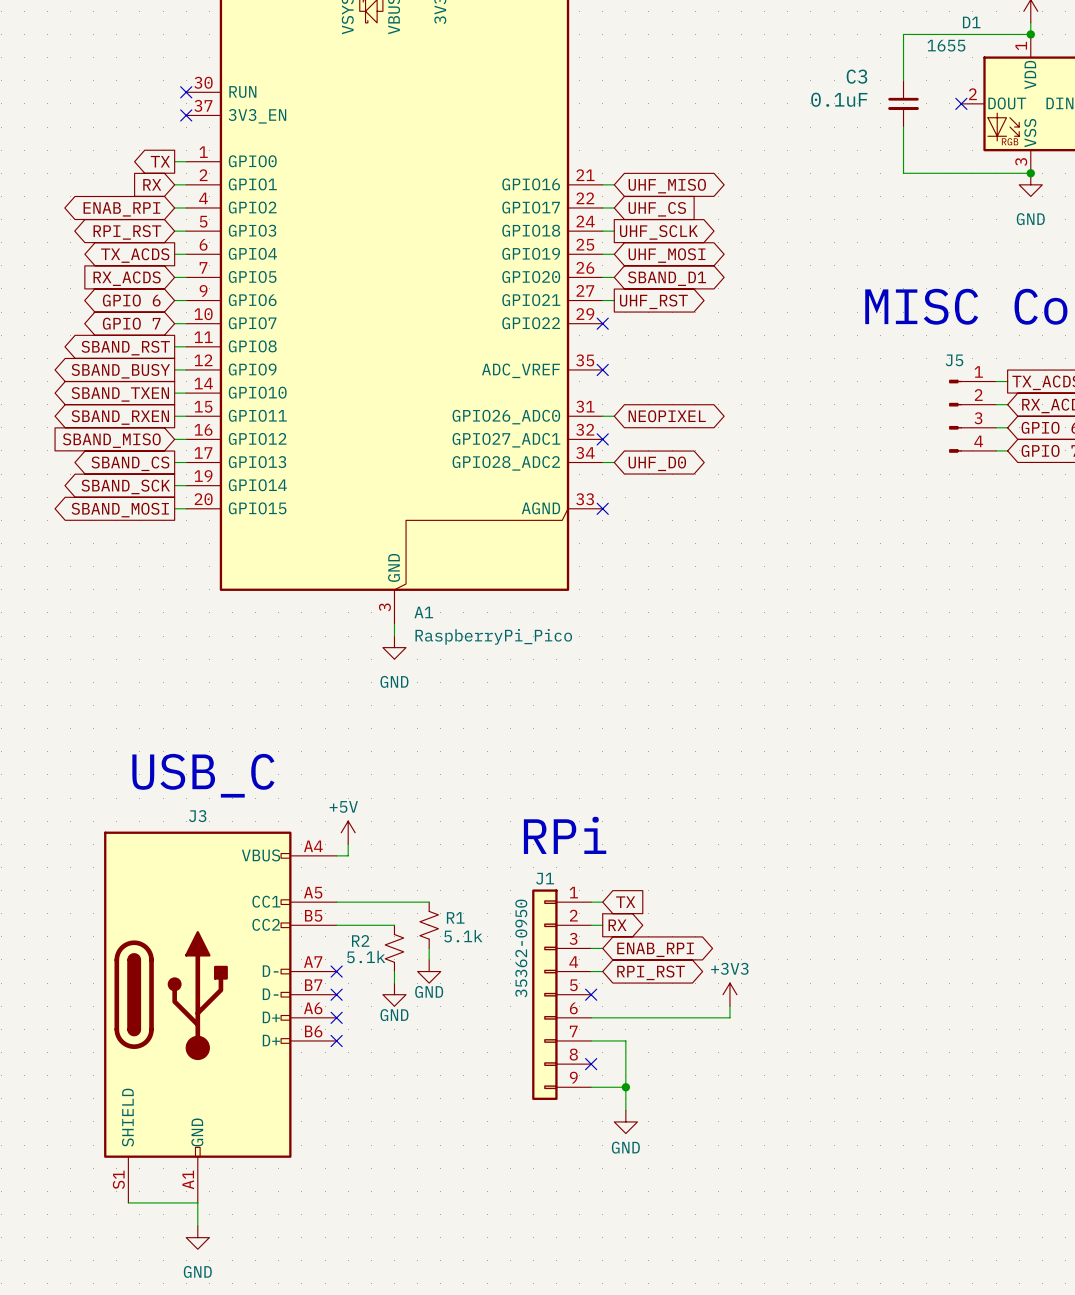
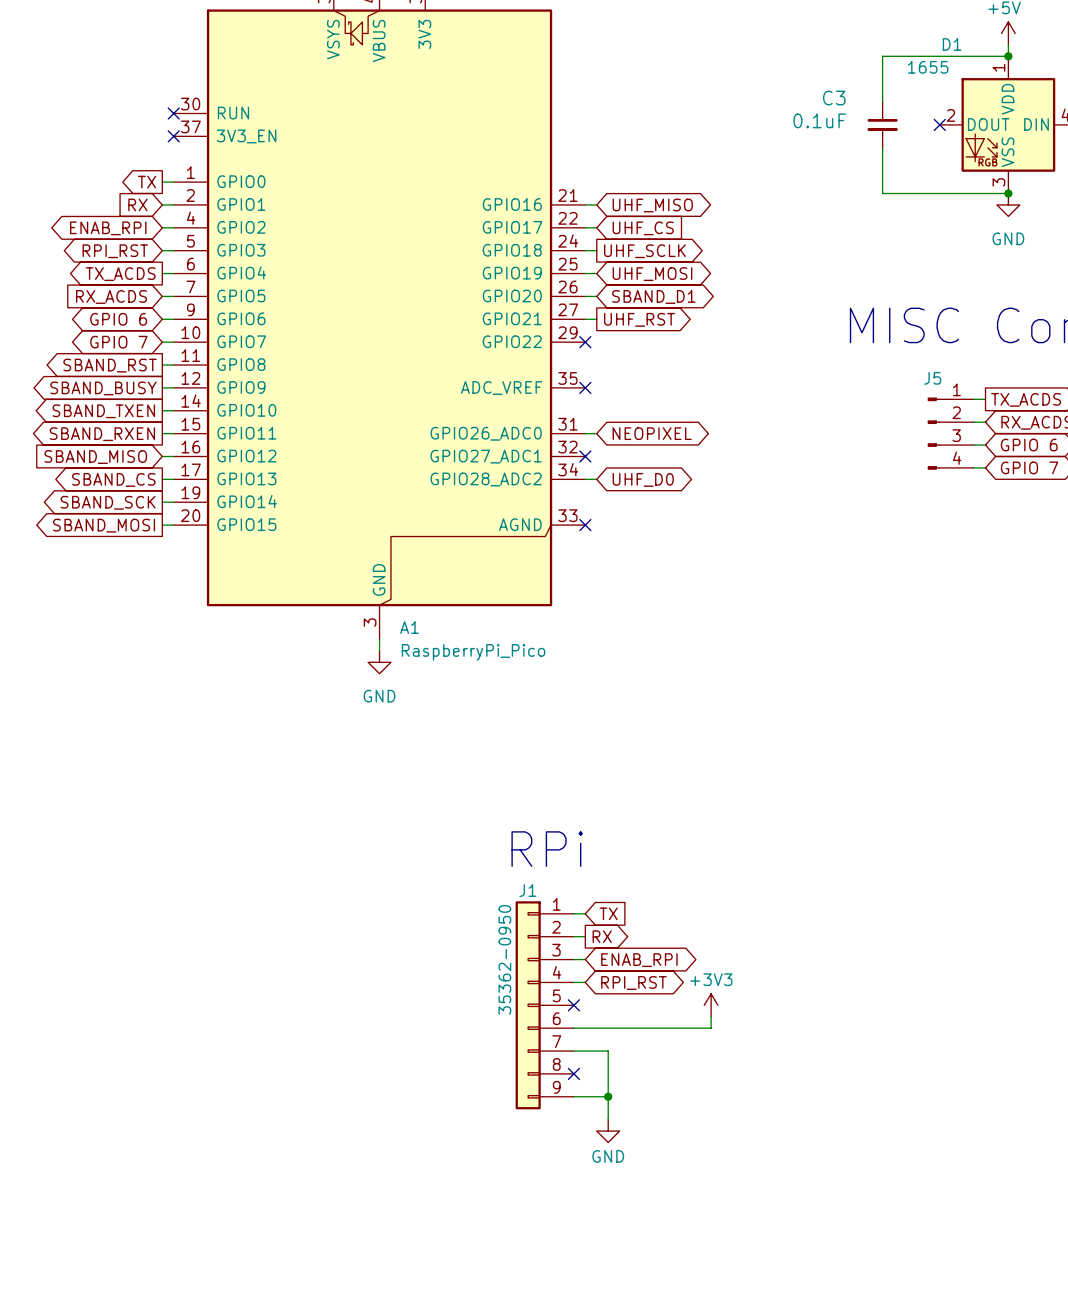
text: USB_C (203, 775) -> none
power symbol: +5V (348, 832) -> none
wire: (348, 844) (348, 855) (336, 855) -> none
wire: (336, 902) (429, 902) -> none
wire: (336, 925) (394, 925) -> none
R1: 5.1k (429, 925) -> none
R2: 5.1k (394, 948) -> none
wire: (429, 948) (429, 959) -> none
no-connect mark: (336, 971) -> none
wire: (394, 971) (394, 983) -> none
power symbol: GND (429, 971) -> none
no-connect mark: (336, 994) -> none
power symbol: GND (394, 994) -> none
J3: (220, 1017) -> none
no-connect mark: (336, 1017) -> none
no-connect mark: (336, 1040) -> none
wire: (128, 1202) (197, 1202) (197, 1226) -> none
power symbol: GND (197, 1237) -> none

